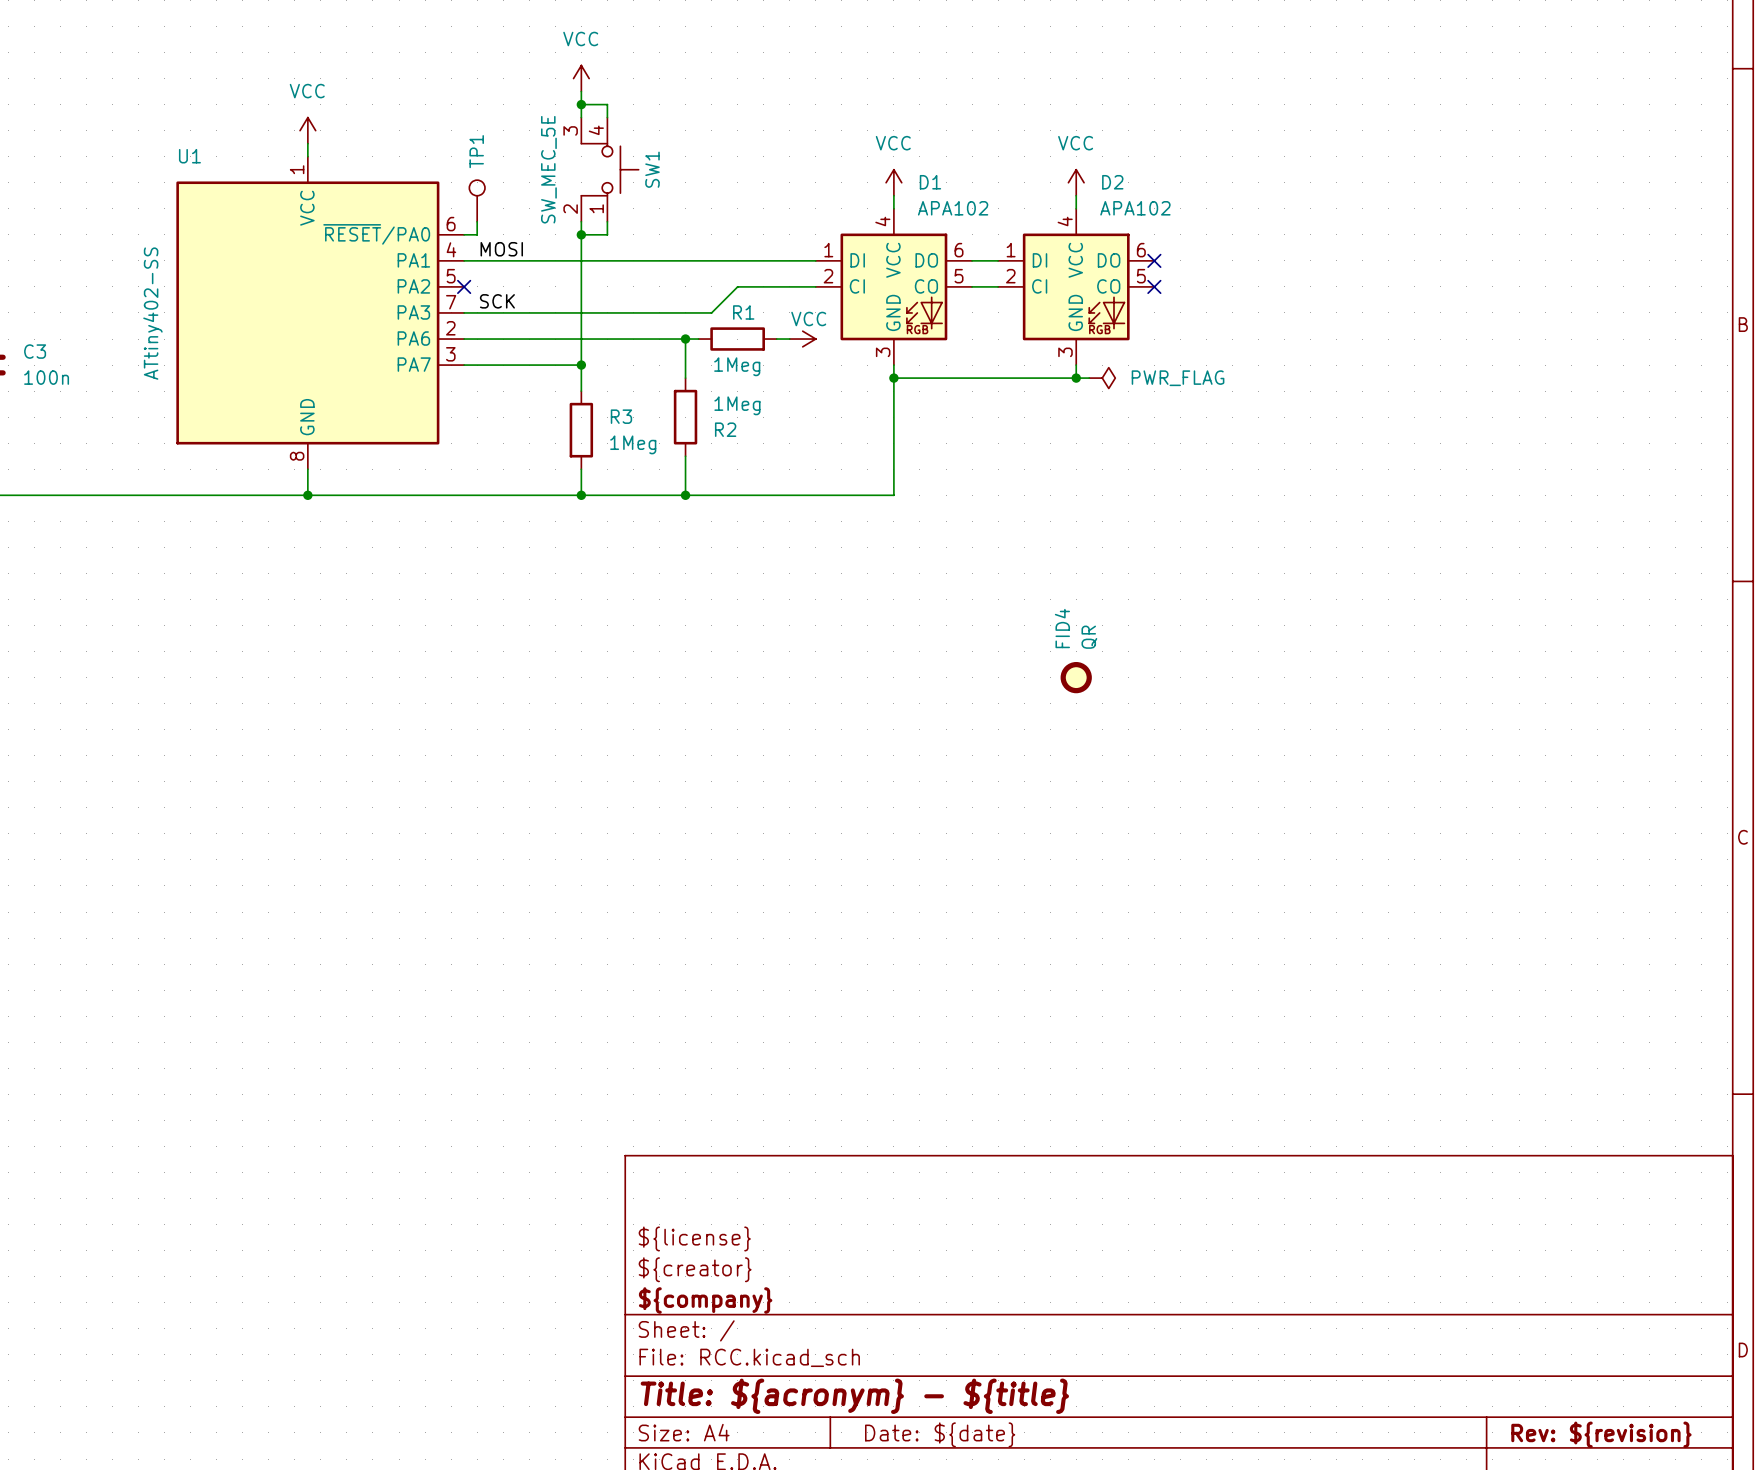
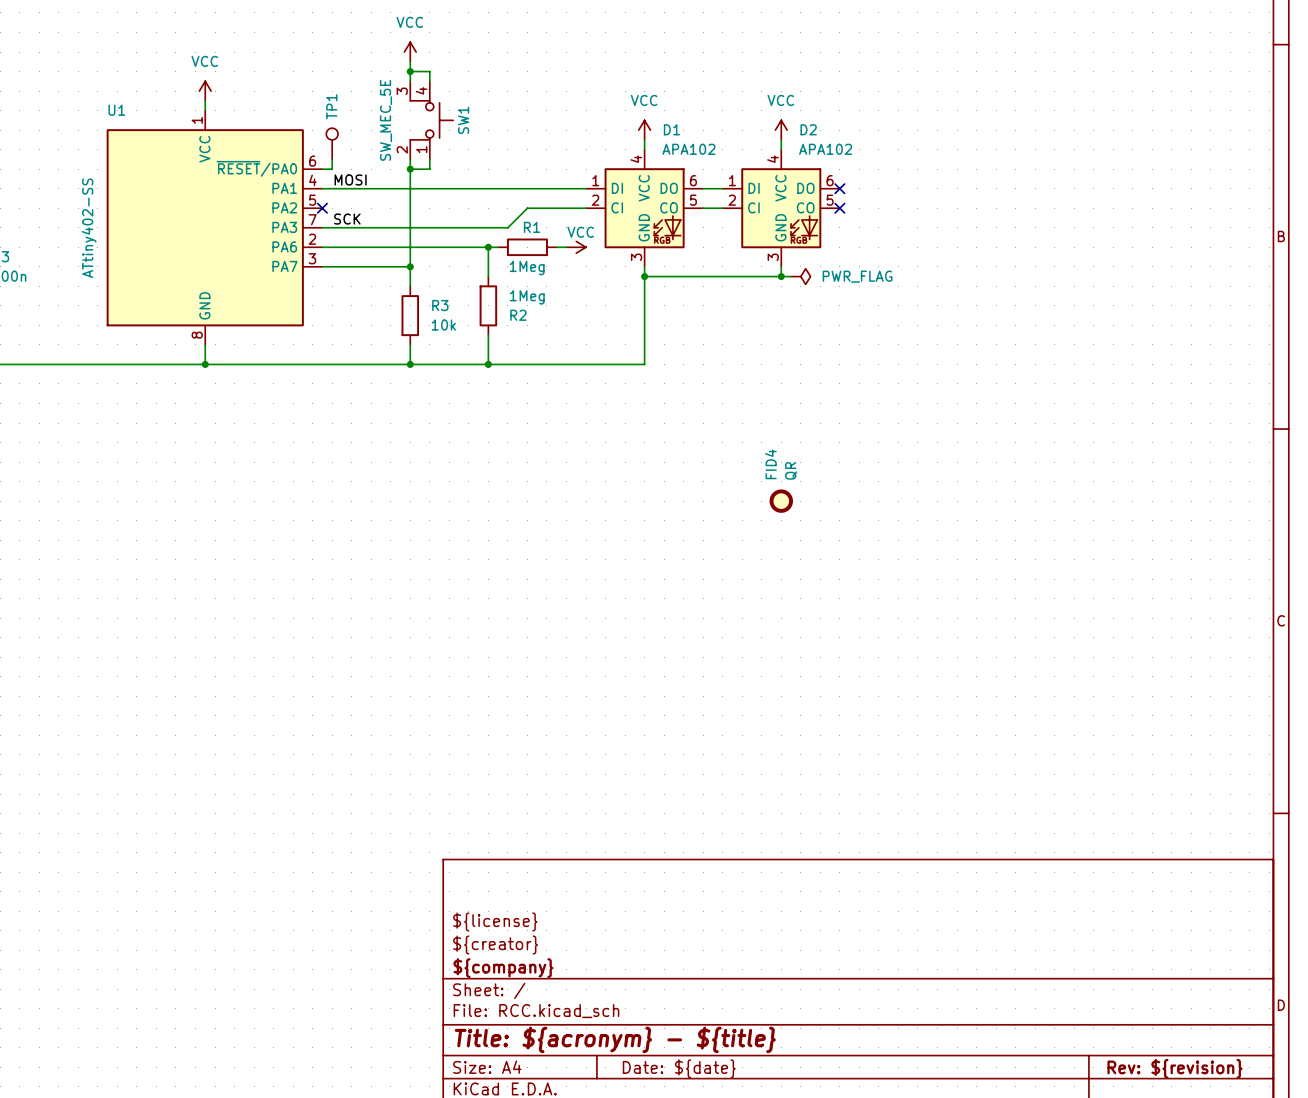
R3 value: 1Meg (633, 444) -> 10k (443, 325)

